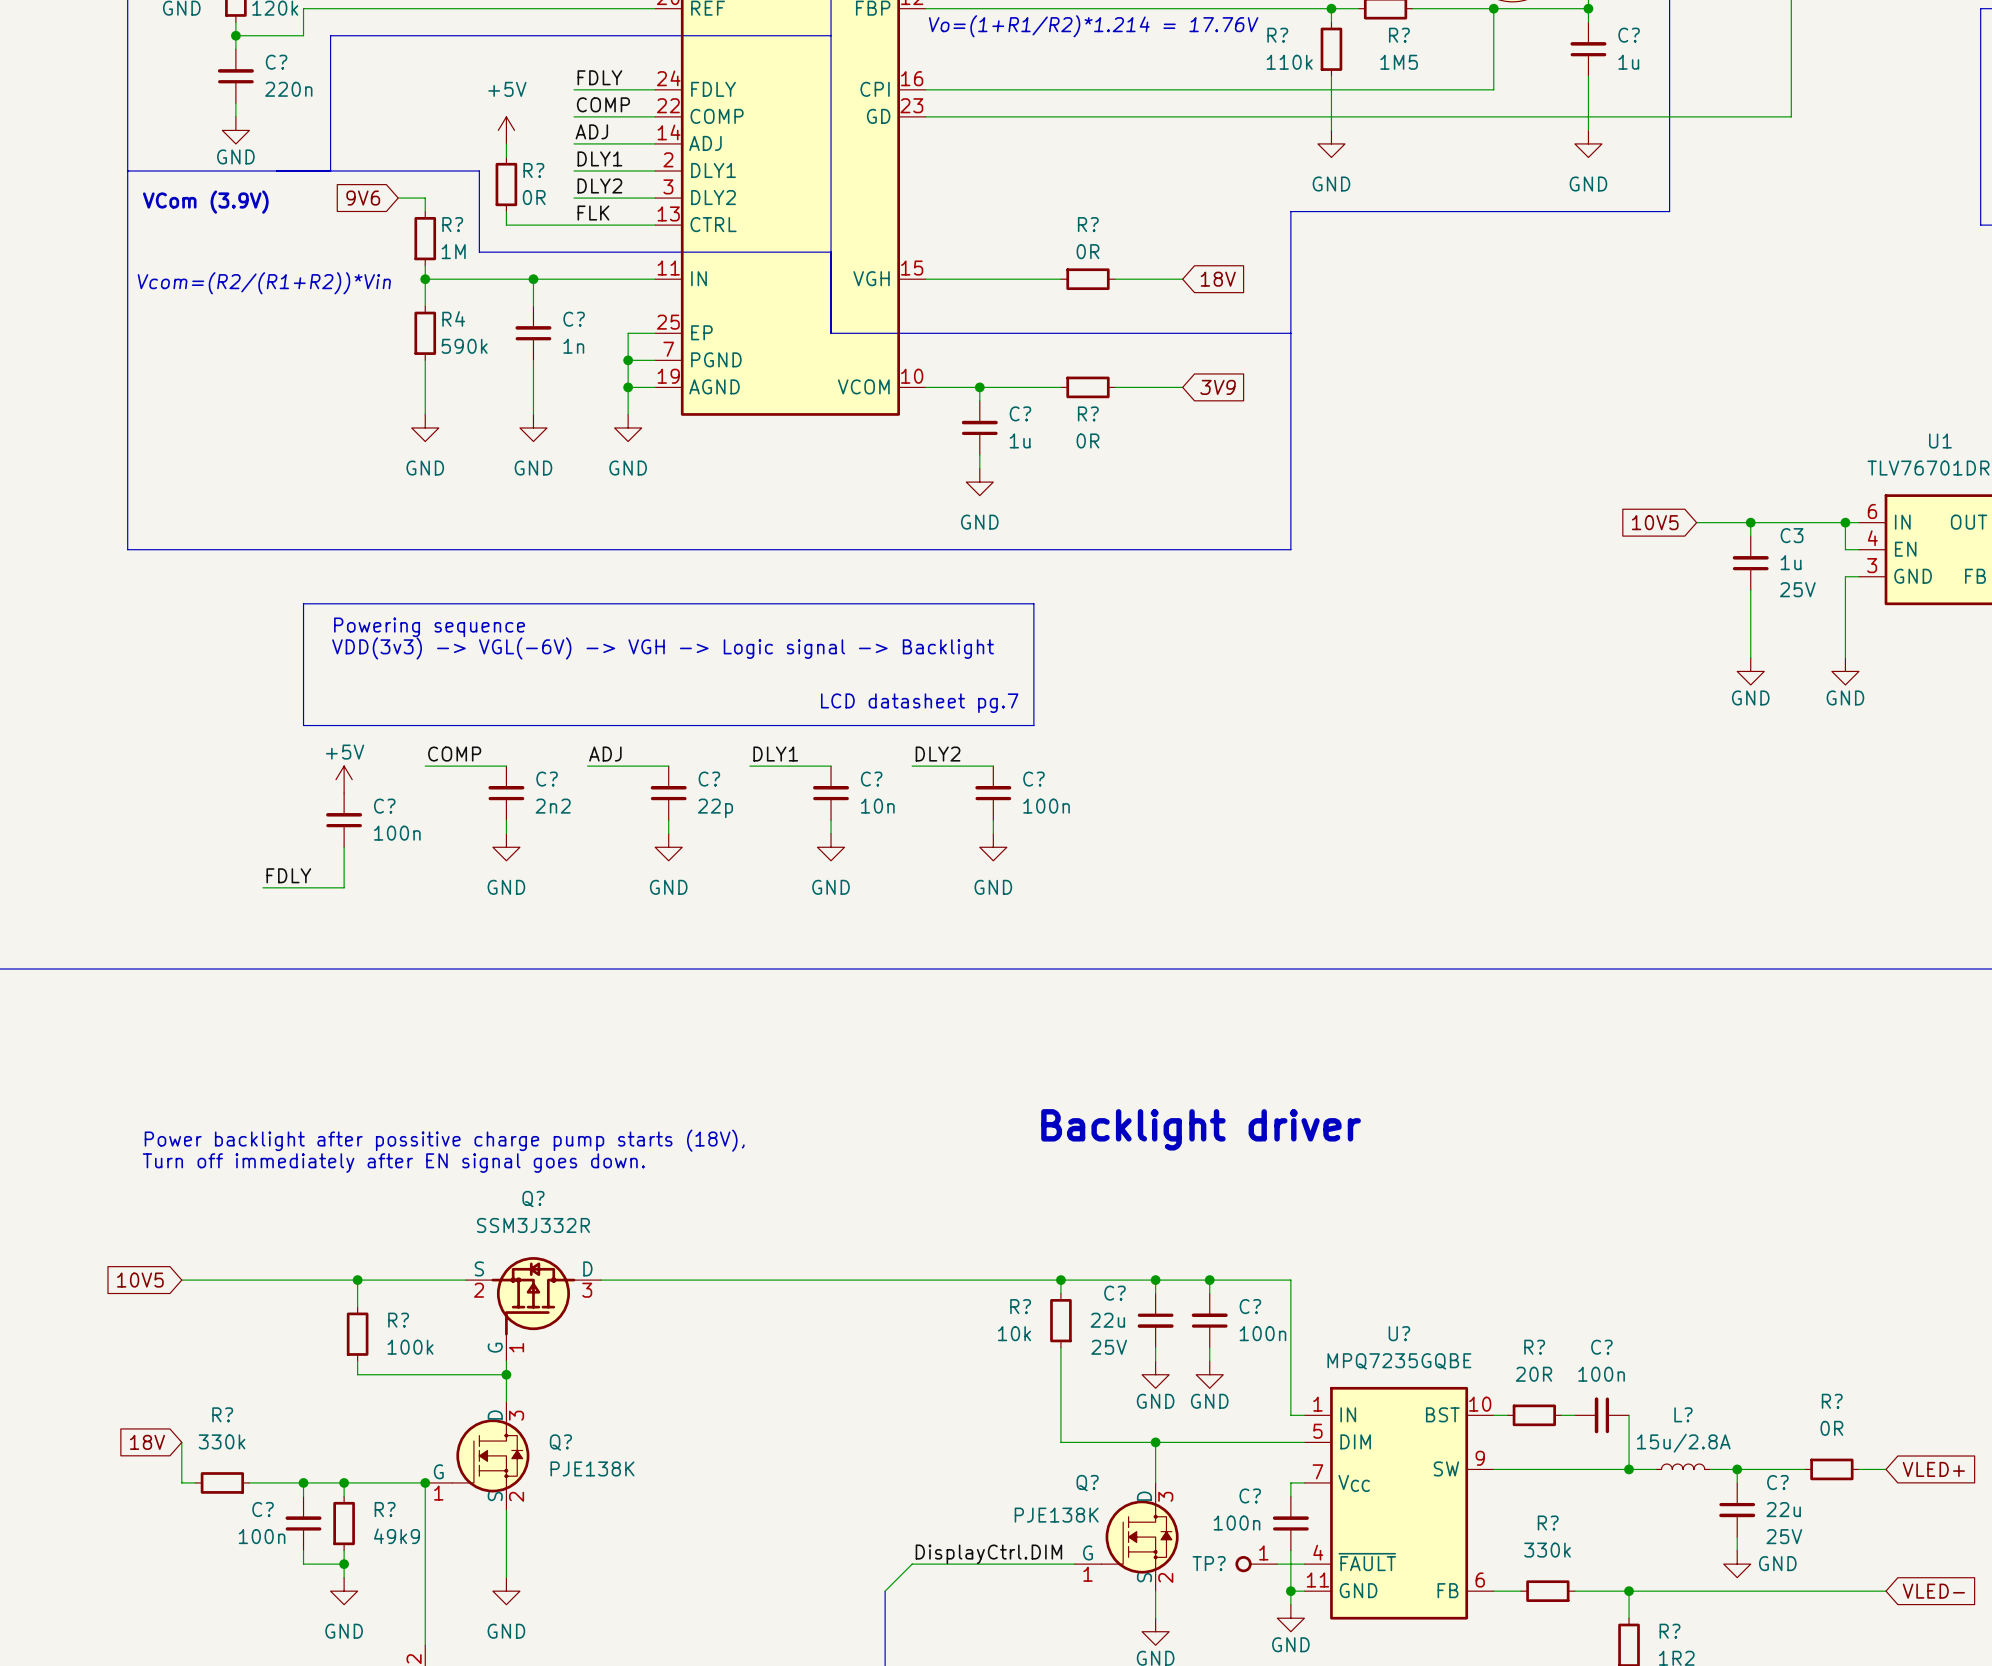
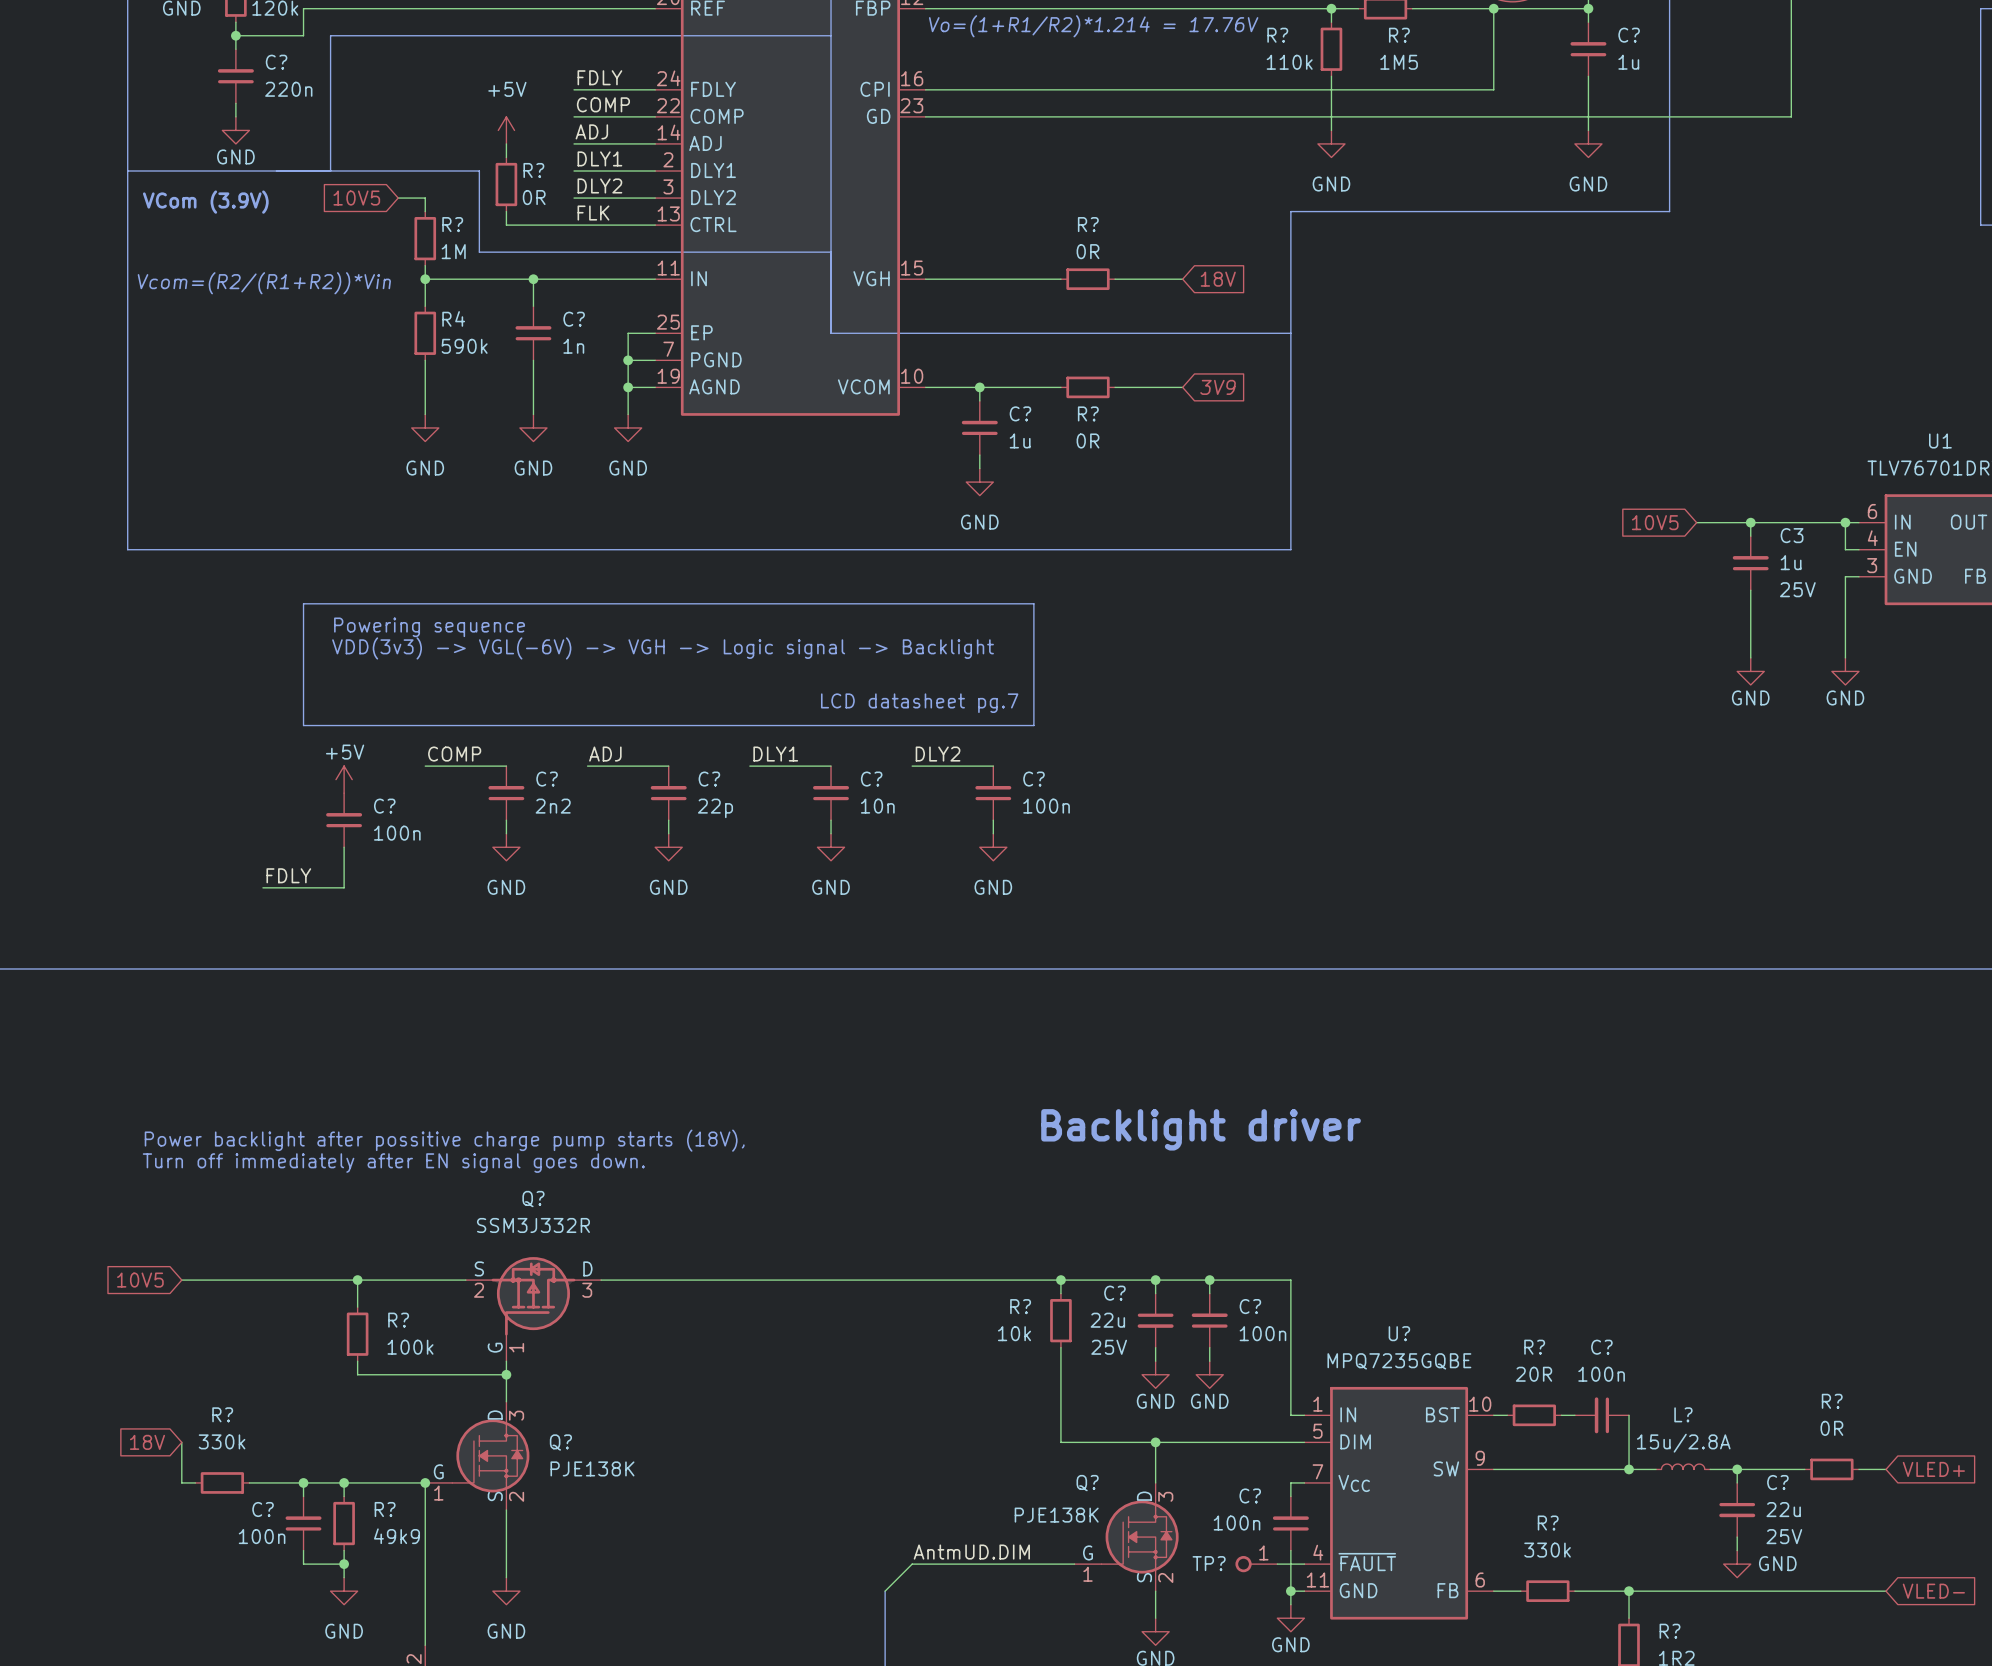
global label: 9V6 (363, 198) -> 10V5 (356, 198)
label: DisplayCtrl.DIM (988, 1554) -> AntmUD.DIM (971, 1552)

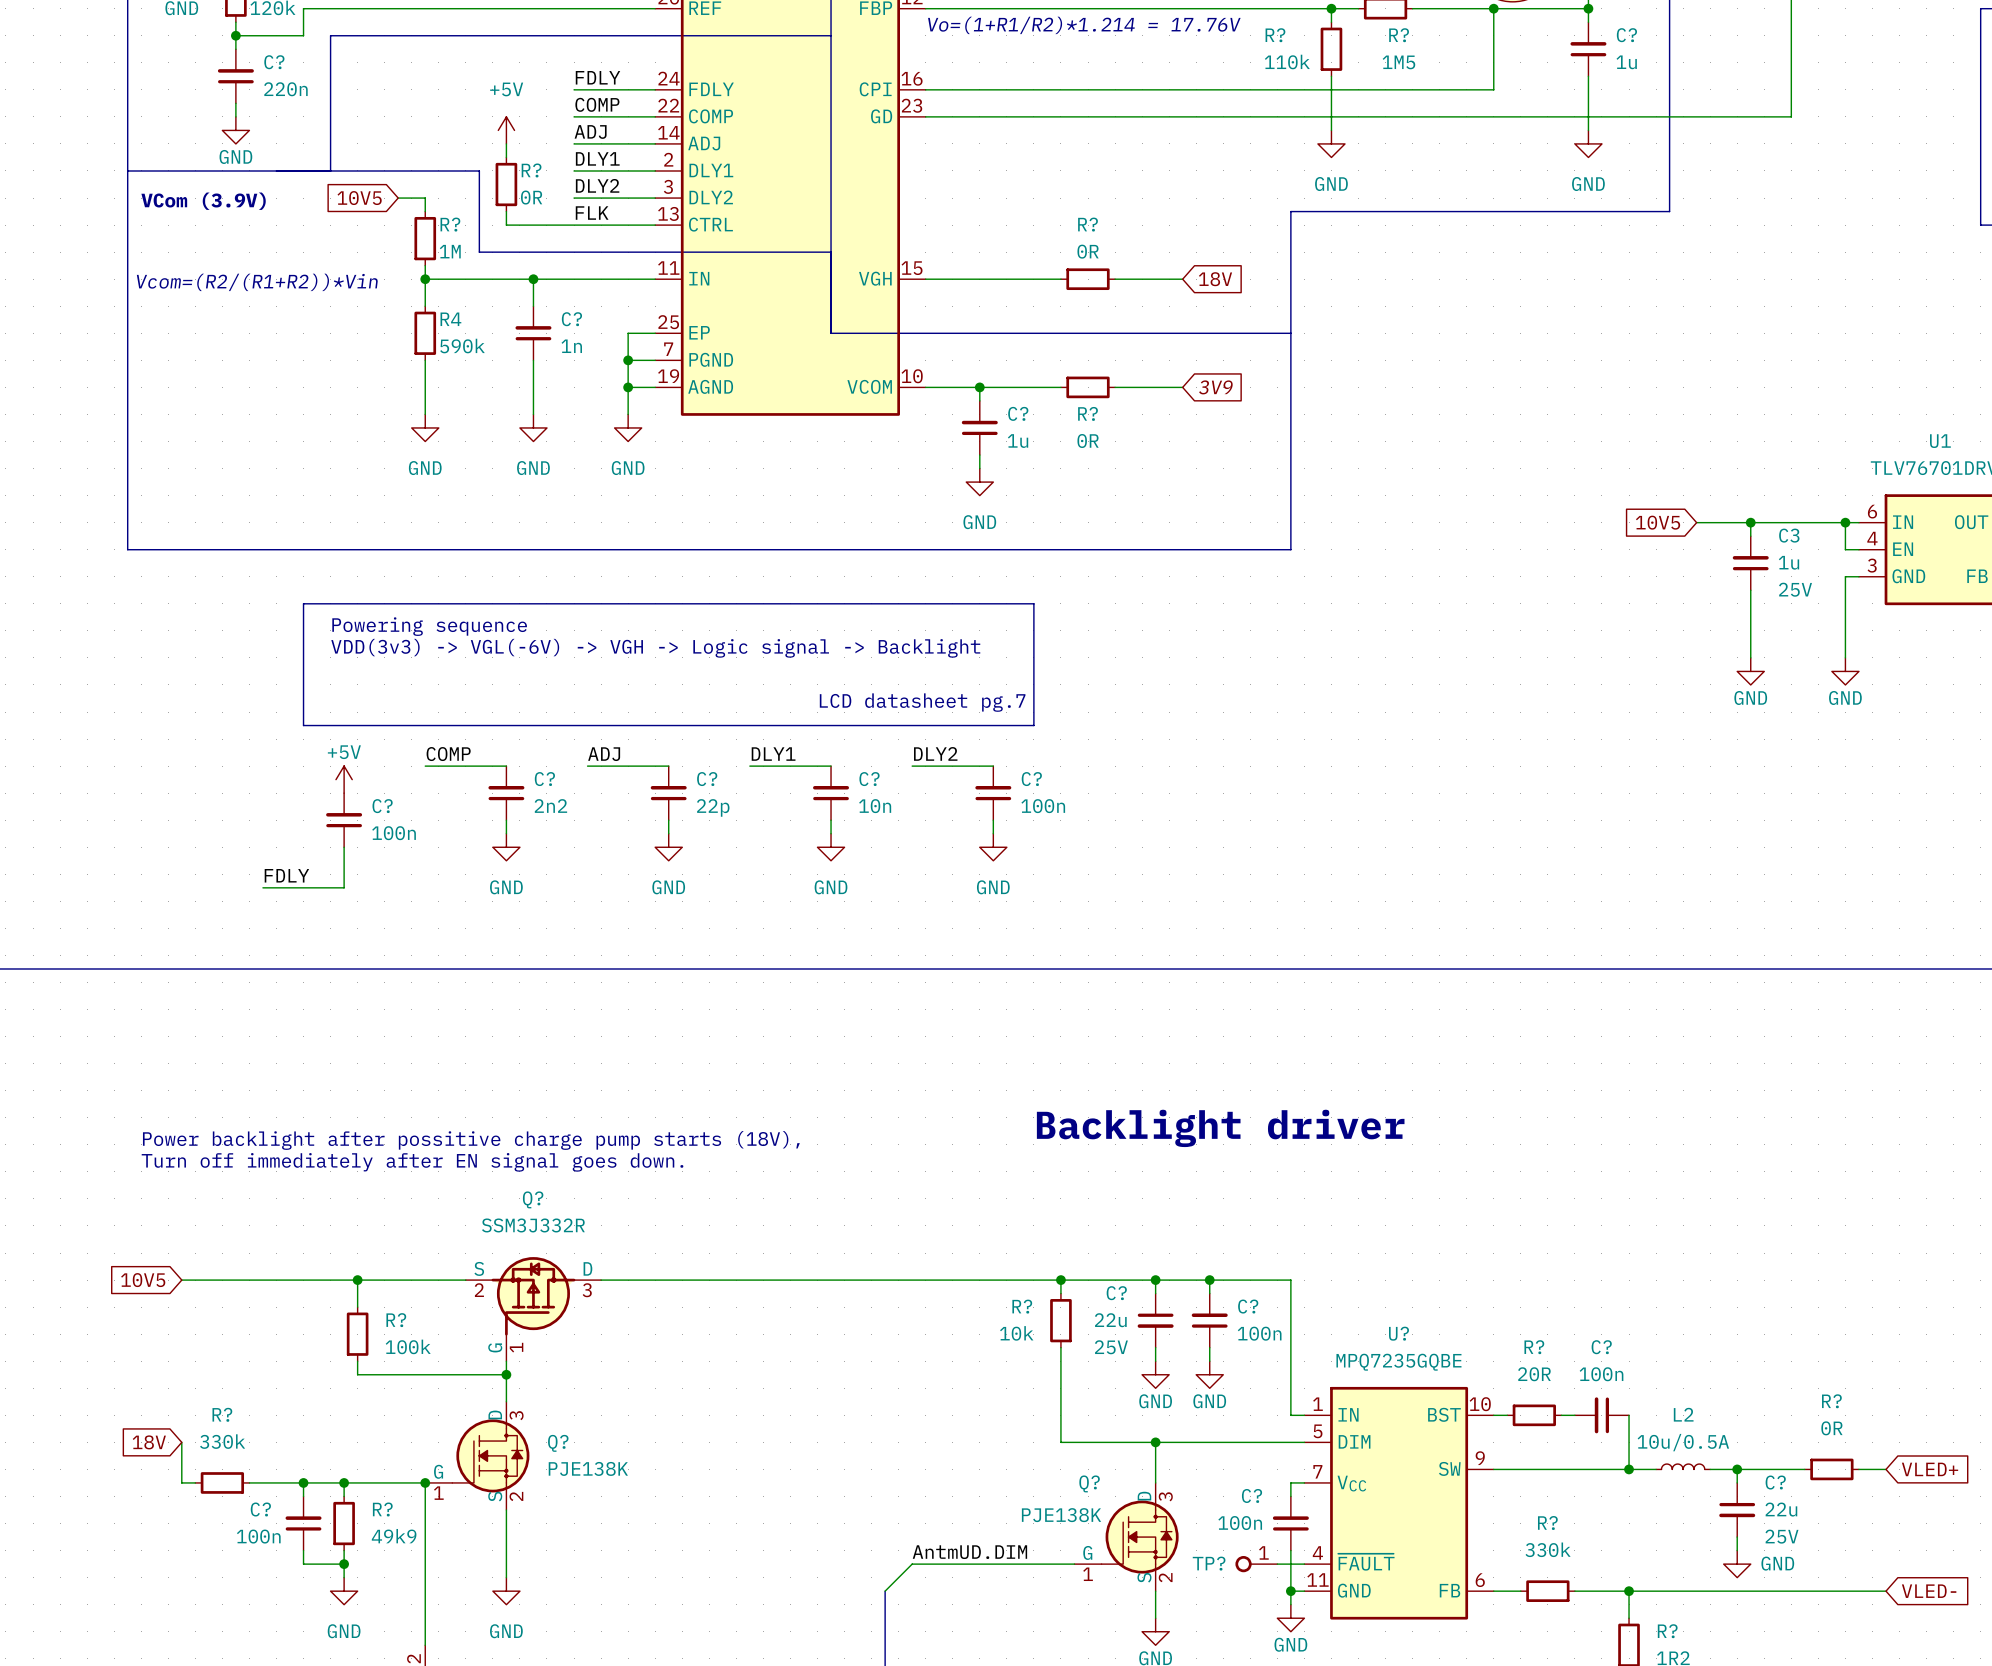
L? name: L? (1683, 1414) -> L2 (1683, 1414)
L? text: 15u/2.8A (1683, 1443) -> 10u/0.5A (1683, 1442)

